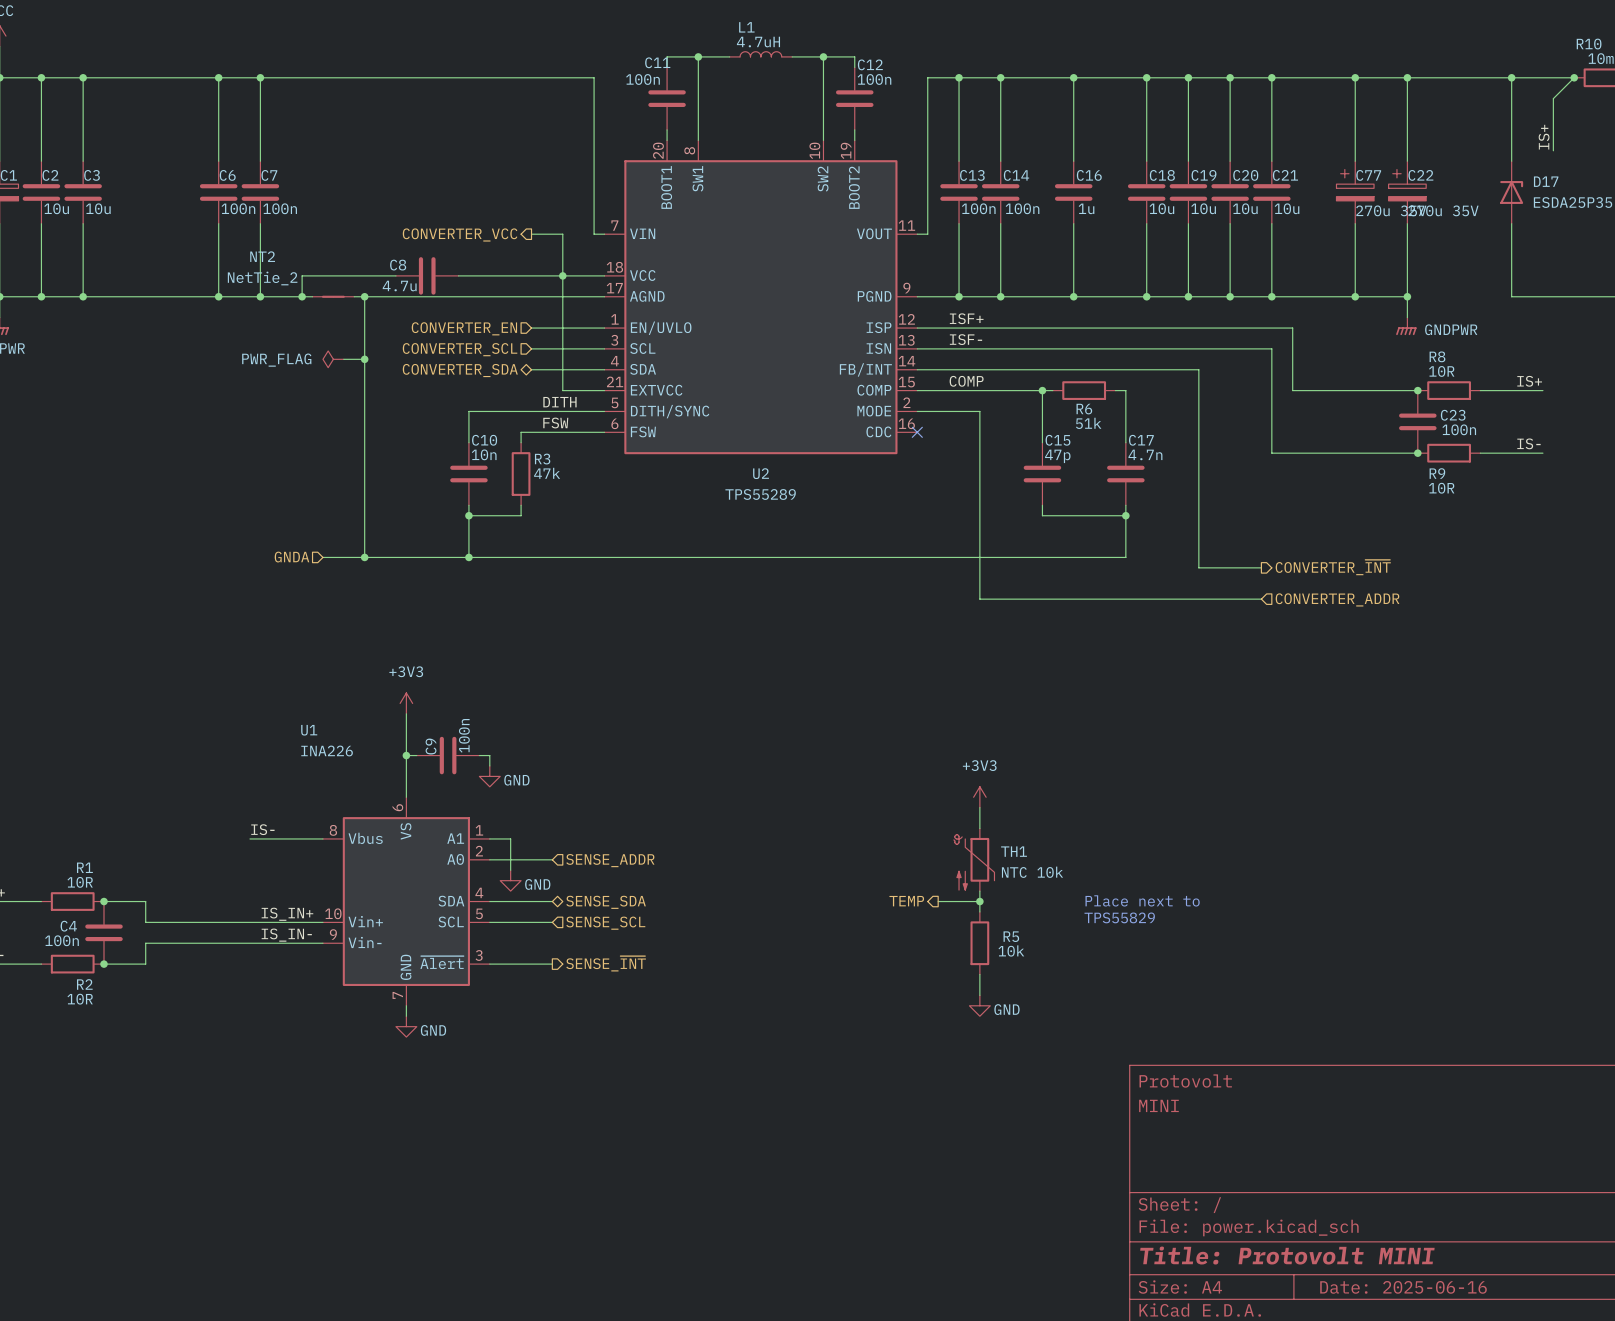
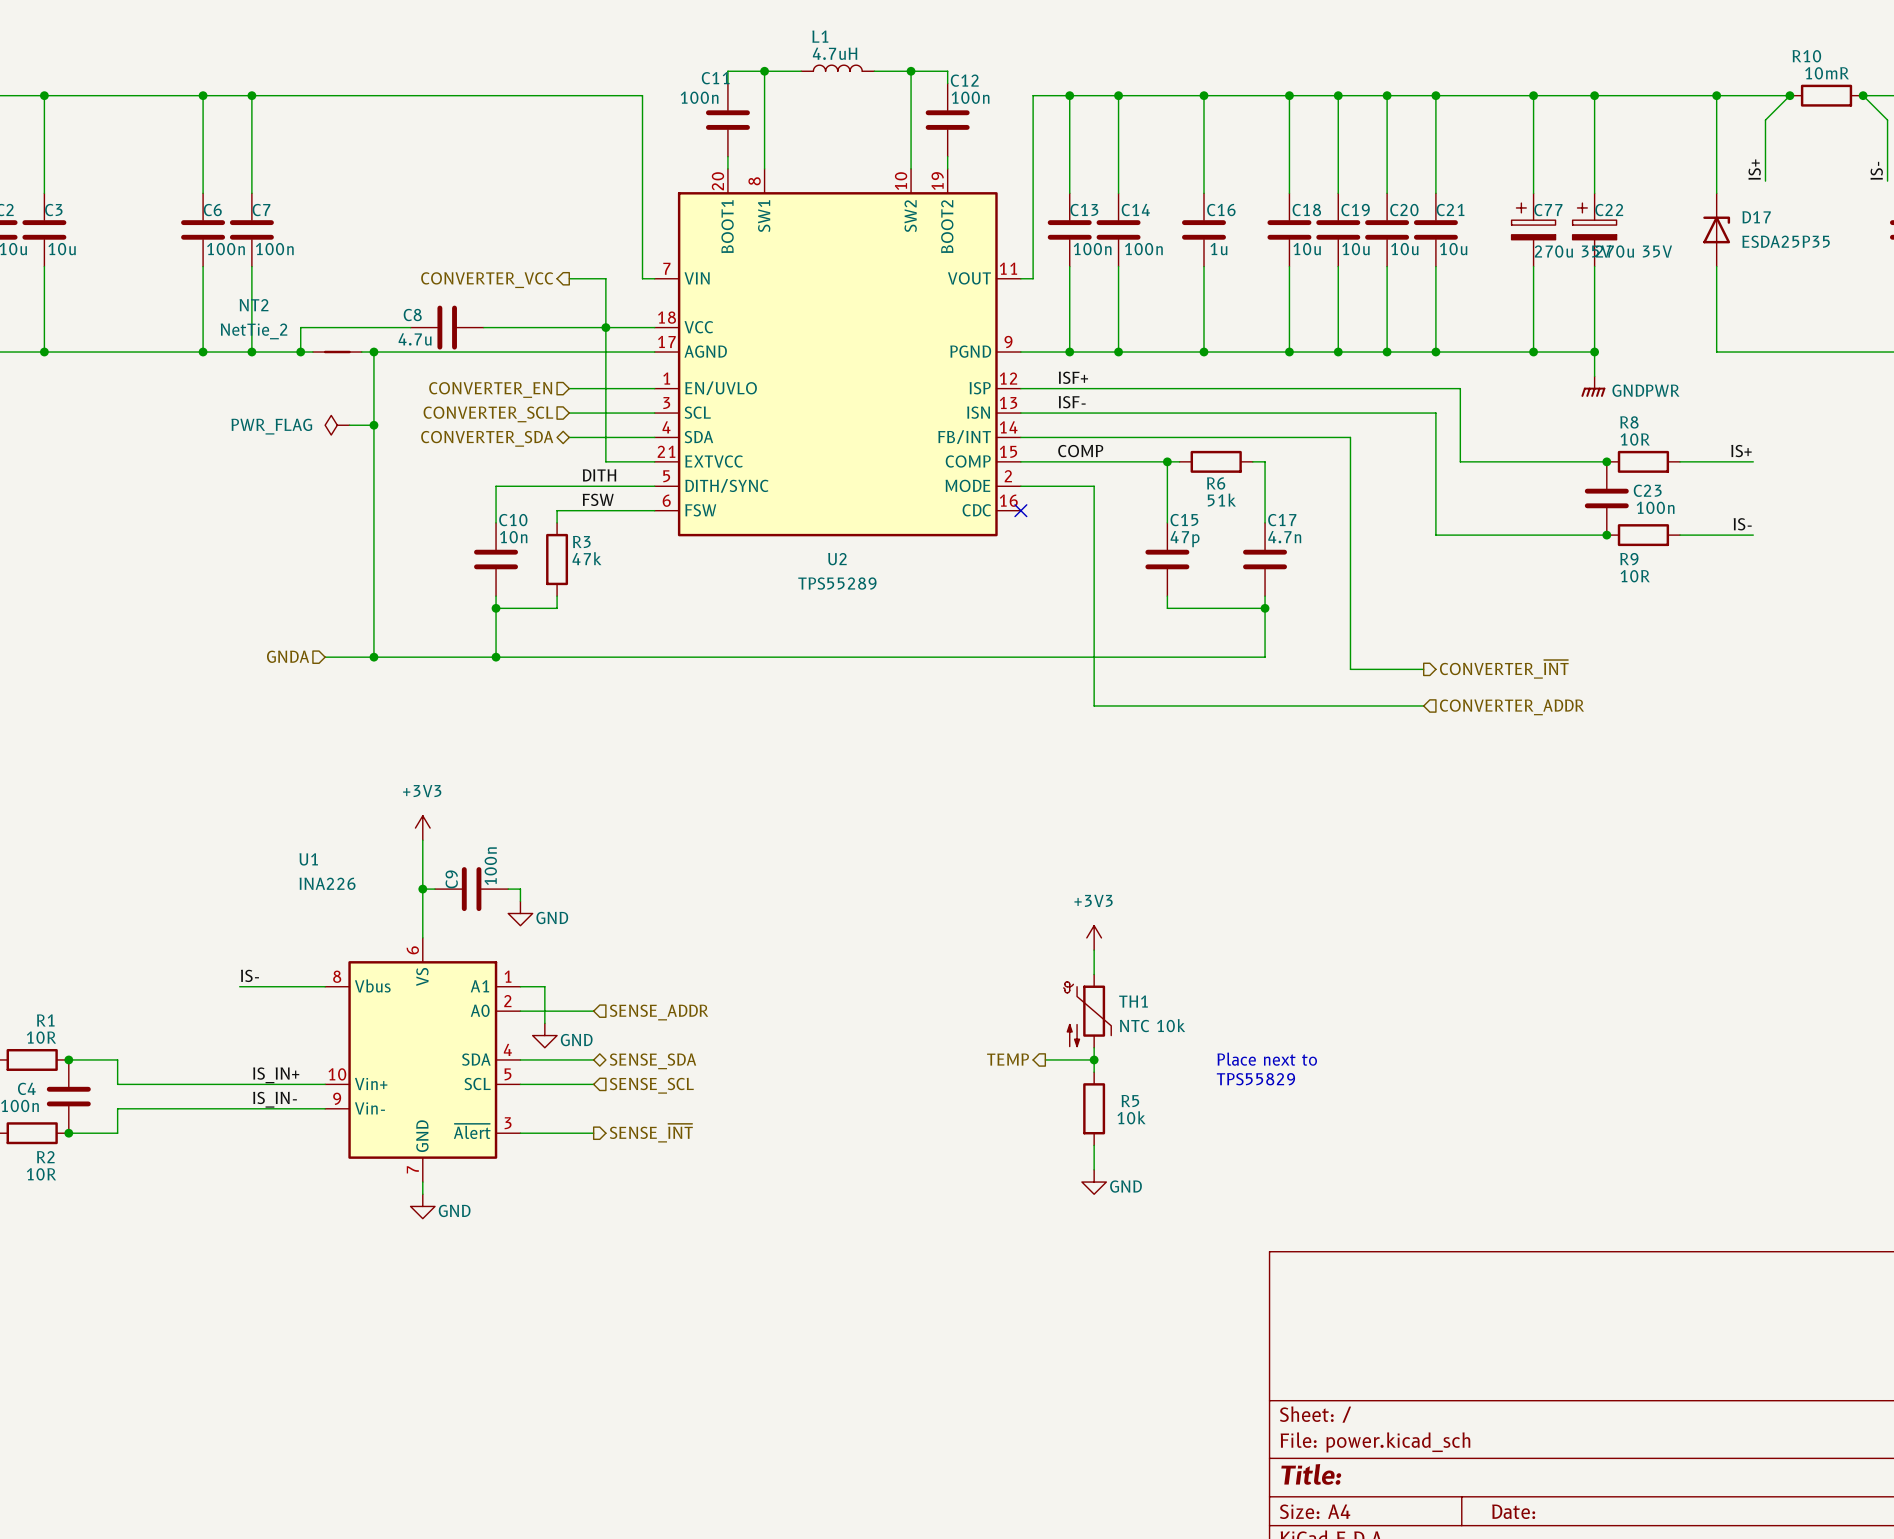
title block: Protovolt (1185, 1081) -> none
title block: MINI (1158, 1105) -> none
title block: Title: Protovolt MINI (1287, 1255) -> Title: (1311, 1474)
title block: Date: 2025-06-16 (1403, 1287) -> Date: (1513, 1511)

